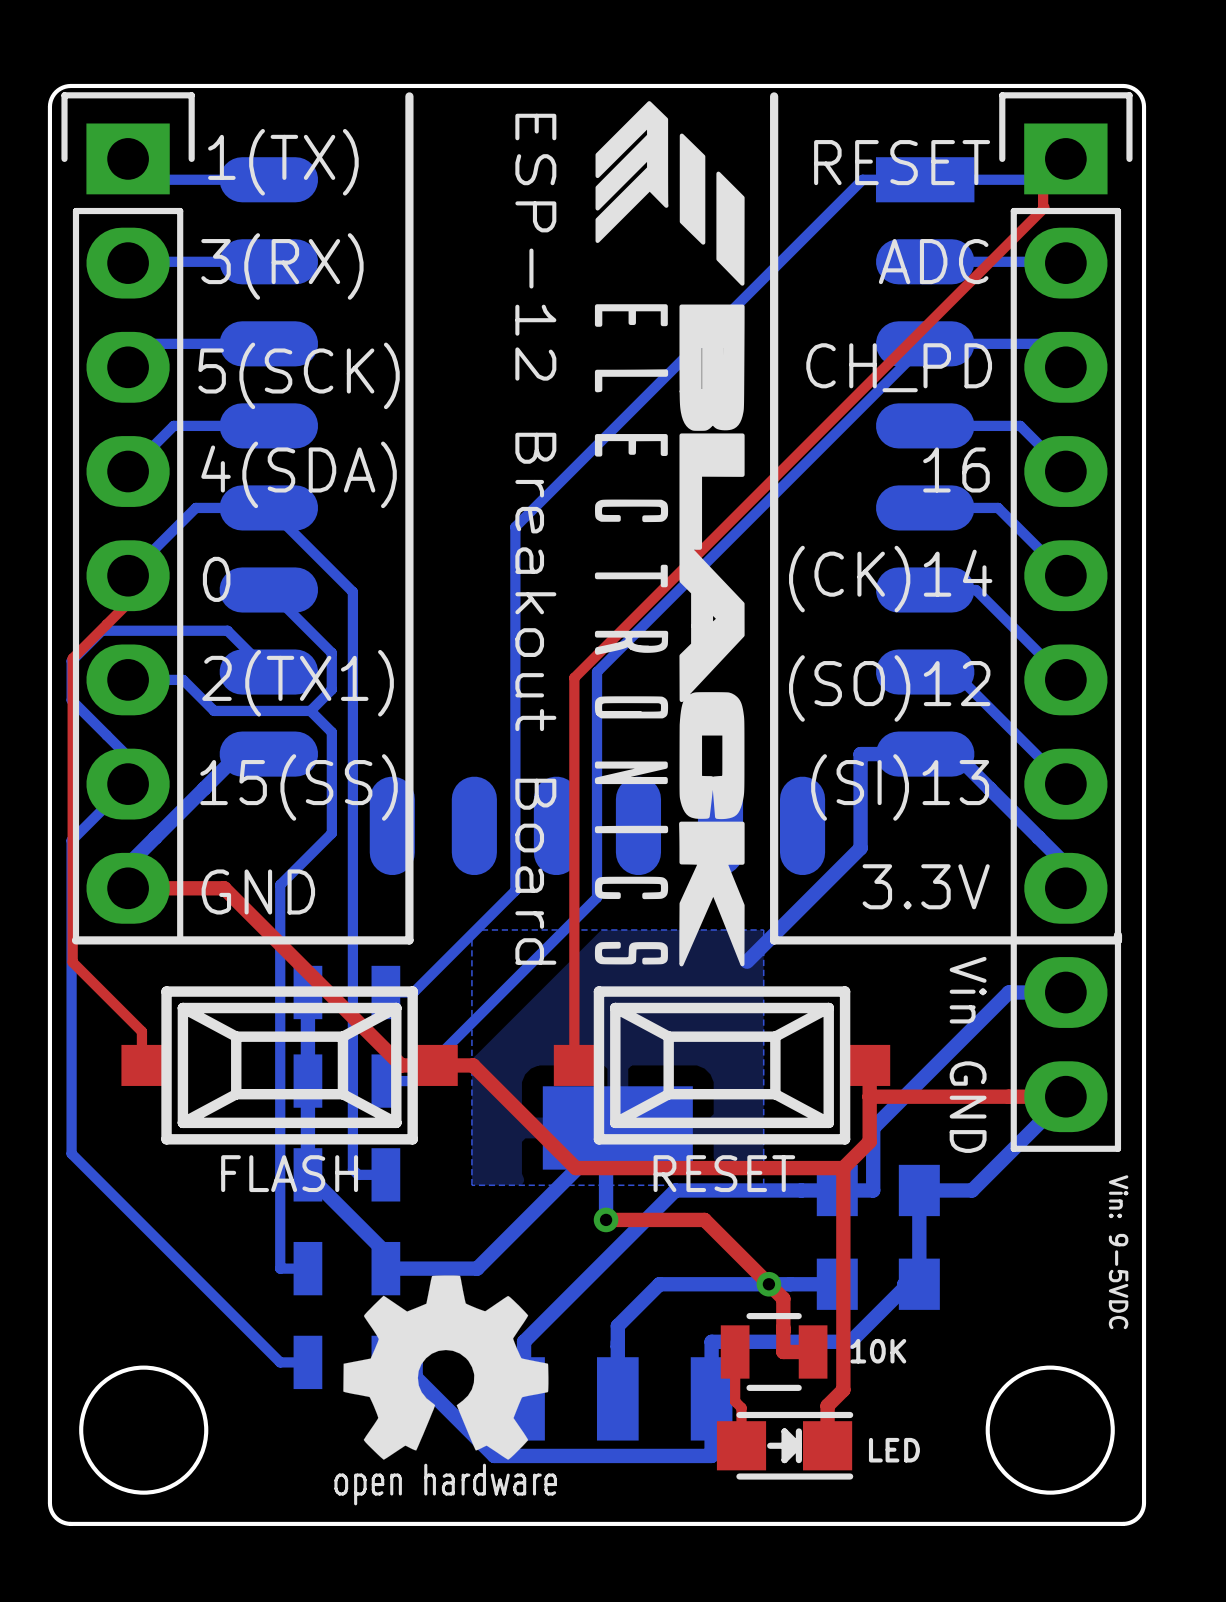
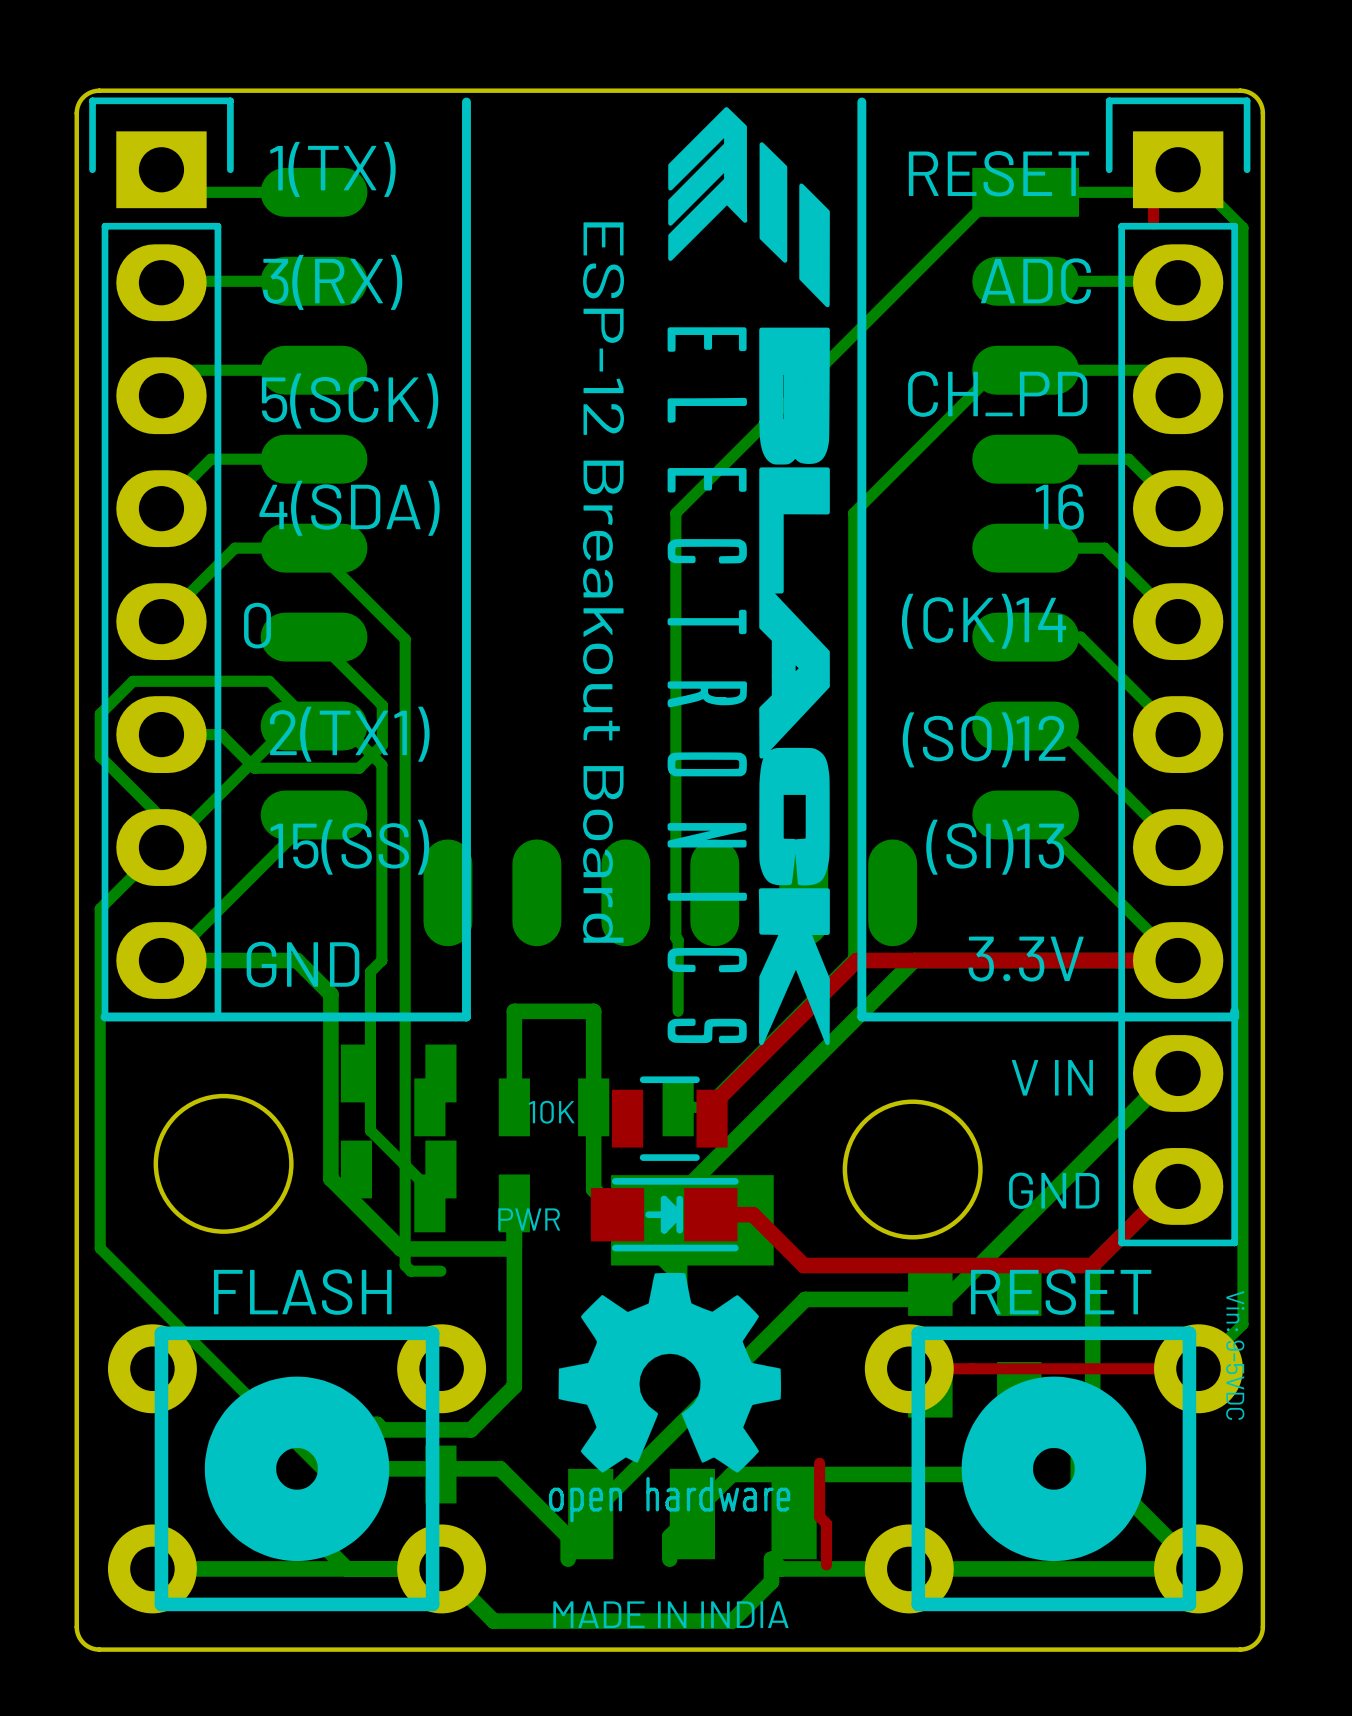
bottom track: none -> (1178, 169) (1184, 169) (1242, 227) (1242, 1324) (1198, 1368)
bottom track: (898, 179) (862, 179) (515, 527) (515, 890) (413, 992) (385, 992) -> (996, 192) (675, 513) (675, 937) (678, 940) (678, 1011)
top track: (1044, 207) (574, 677) (574, 1065) -> none
bottom track: (925, 343) (597, 672) (597, 897) (413, 1081) (385, 1081) -> (1025, 370) (996, 370) (853, 513) (853, 958) (704, 1107) (678, 1107)
top track: (128, 575) (128, 603) (72, 658) (72, 962) (141, 1031) (141, 1065) -> none
bottom track: (310, 710) (331, 732) (331, 833) (280, 884) (280, 1268) (307, 1268) -> none
bottom track: (268, 754) (238, 754) (128, 864) (128, 888) -> (314, 814) (168, 960) (161, 960) (297, 960) (330, 994) (330, 1178) (400, 1248) (514, 1247)
bottom track: (925, 754) (860, 754) (860, 848) (747, 961) -> none
bottom track: (931, 754) (955, 754) (1065, 864) (1065, 888) -> (1032, 814) (1178, 960) (914, 960) (669, 1204) (669, 1265) (593, 1189) (593, 1011) (514, 1011) (514, 1107)
bottom track: none -> (161, 847) (167, 847) (288, 726) (342, 726) (381, 764) (381, 960) (370, 971) (370, 1130) (429, 1190) (429, 1203)
top track: (128, 888) (224, 888) (401, 1065) (473, 1065) (575, 1168) (843, 1168) -> none
top track: none -> (1178, 960) (856, 960) (712, 1105) (712, 1118)
bottom zone outline: (471, 929) (471, 1185) (763, 1185) (763, 929) (471, 929) -> none
text: Vin (968, 990) -> V IN (1052, 1077)
bottom track: (307, 992) (307, 1174) (385, 1252) (385, 1268) (477, 1268) (617, 1127) -> none
bottom track: (1059, 992) (1008, 992) (873, 1128) (873, 1190) (675, 1190) (524, 1341) (524, 1398) -> (1171, 1073) (945, 1299) (805, 1299) (568, 1536)
round board edge: none -> [842, 1099, 983, 1240]
part: none -> (472, 1107)
part: none -> (635, 1107)
part: FLASH (289, 1065) -> none
part: RESET (722, 1065) -> none
top track: (869, 1065) (869, 1141) (843, 1168) -> none
top track: (869, 1096) (1059, 1096) -> (710, 1214) (753, 1214) (803, 1265) (1092, 1265) (1171, 1186)
bottom track: (1065, 1096) (972, 1190) (919, 1190) (919, 1269) (904, 1284) -> (1178, 1186) (1171, 1186) (1092, 1265) (1092, 1474) (1104, 1474) (1198, 1568) (781, 1568) (771, 1559) (771, 1581) (732, 1621) (493, 1621) (441, 1568) (152, 1568)
text rotation: 0° (968, 1107) -> 90° counterclockwise (1054, 1190)
part: none -> (472, 1203)
bottom track: none -> (514, 1203) (514, 1386) (470, 1429) (382, 1429) (377, 1424) (291, 1424) (252, 1463) (252, 1474) (347, 1568)
part: none -> PWR (664, 1214)
top track: (843, 1168) (843, 1389) (827, 1405) (827, 1445) -> none
part: (346, 1174) -> none
top track: (606, 1219) (704, 1219) (783, 1298) (783, 1351) (813, 1351) -> none
via: (606, 1219) -> none
top track: none -> (909, 1368) (1198, 1368)
part: (346, 1268) -> none
via: (768, 1284) -> none
bottom track: (837, 1284) (659, 1284) (617, 1325) (617, 1398) -> none
bottom track: (904, 1284) (904, 1287) (850, 1341) (711, 1341) (711, 1455) (494, 1455) (415, 1377) (415, 1362) (385, 1362) -> none
part position: (774, 1351) -> (669, 1118)
part value position: 10K (878, 1351) -> 10K (551, 1112)
part: none -> FLASH (297, 1468)
bottom track: none -> (341, 1468) (500, 1468) (568, 1536)
part: none -> RESET (1053, 1468)
bottom track: none -> (1003, 1474) (731, 1474) (669, 1536) (669, 1559)
round board edge: [985, 1365, 1115, 1495] -> none
drawing position: (445, 1390) -> (669, 1397)
bottom track: none -> (568, 1536) (568, 1559)
round board edge position: (143, 1430) -> (223, 1163)
part: LED (785, 1445) -> none
text: none -> MADE IN INDIA (670, 1614)

